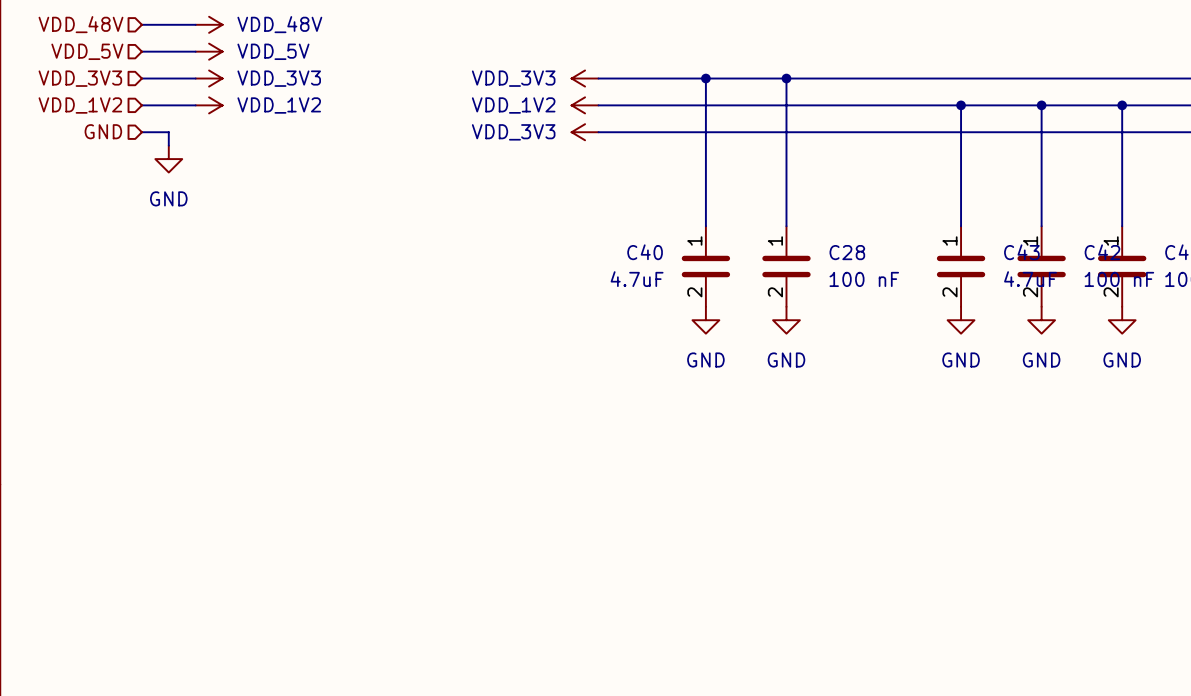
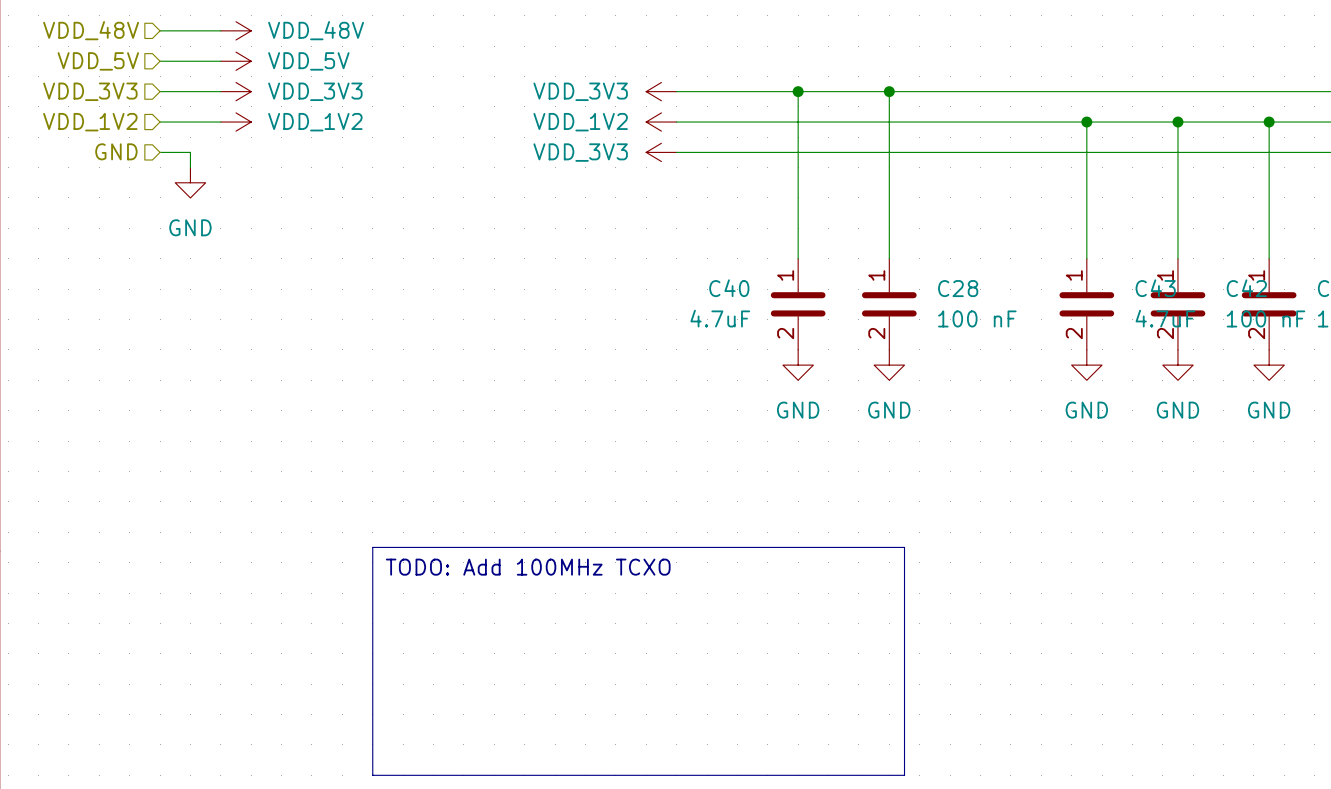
line: none -> (372, 547) (904, 547) (904, 775) (372, 775) (372, 547)
text: none -> TODO: Add 100MHz TCXO (528, 567)

